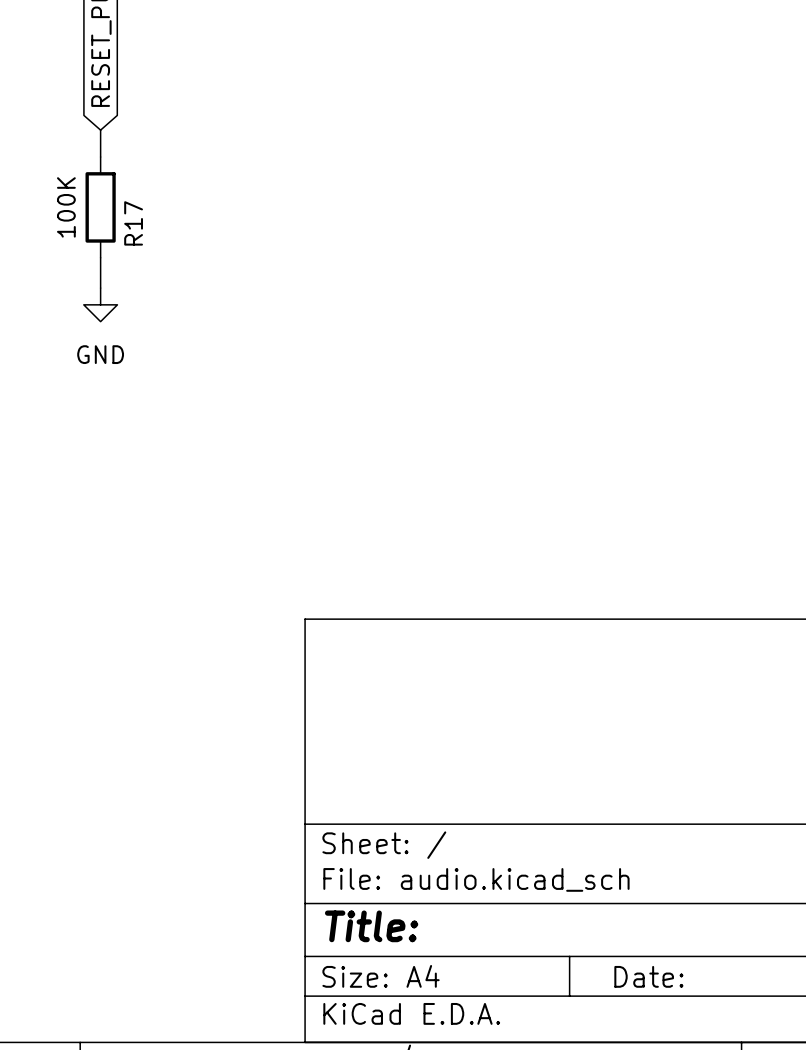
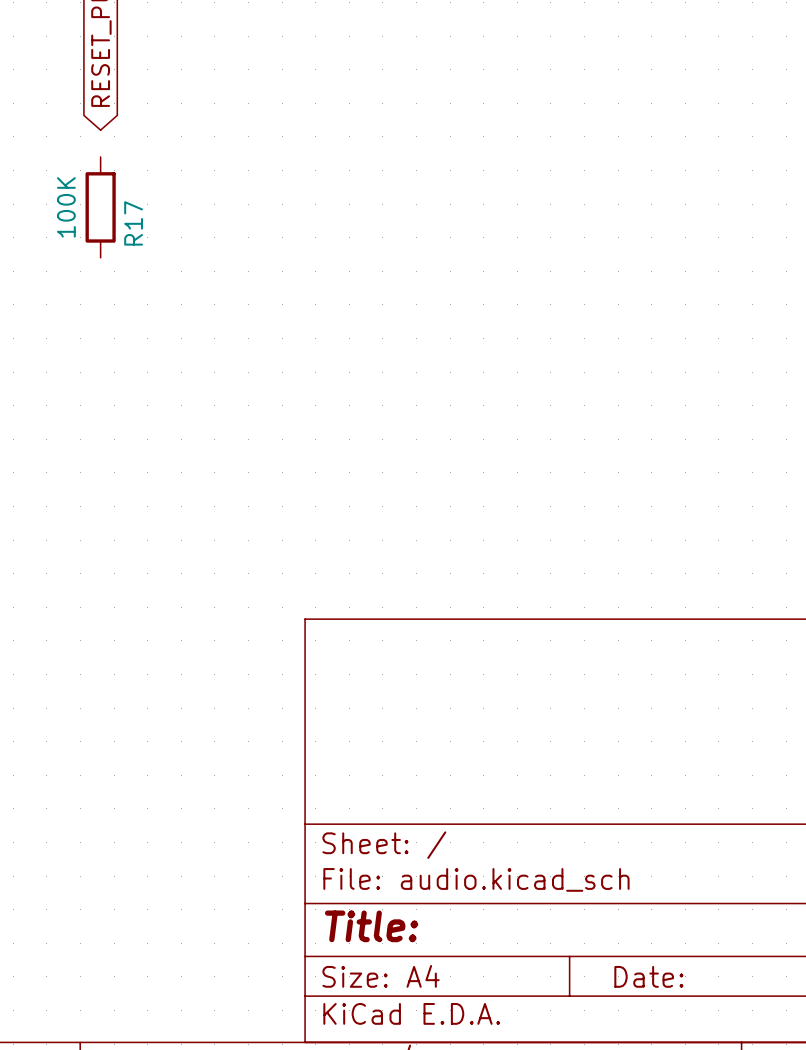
wire: (100, 130) (100, 157) -> none
wire: (100, 257) (100, 288) -> none
power symbol: GND (100, 304) -> none

